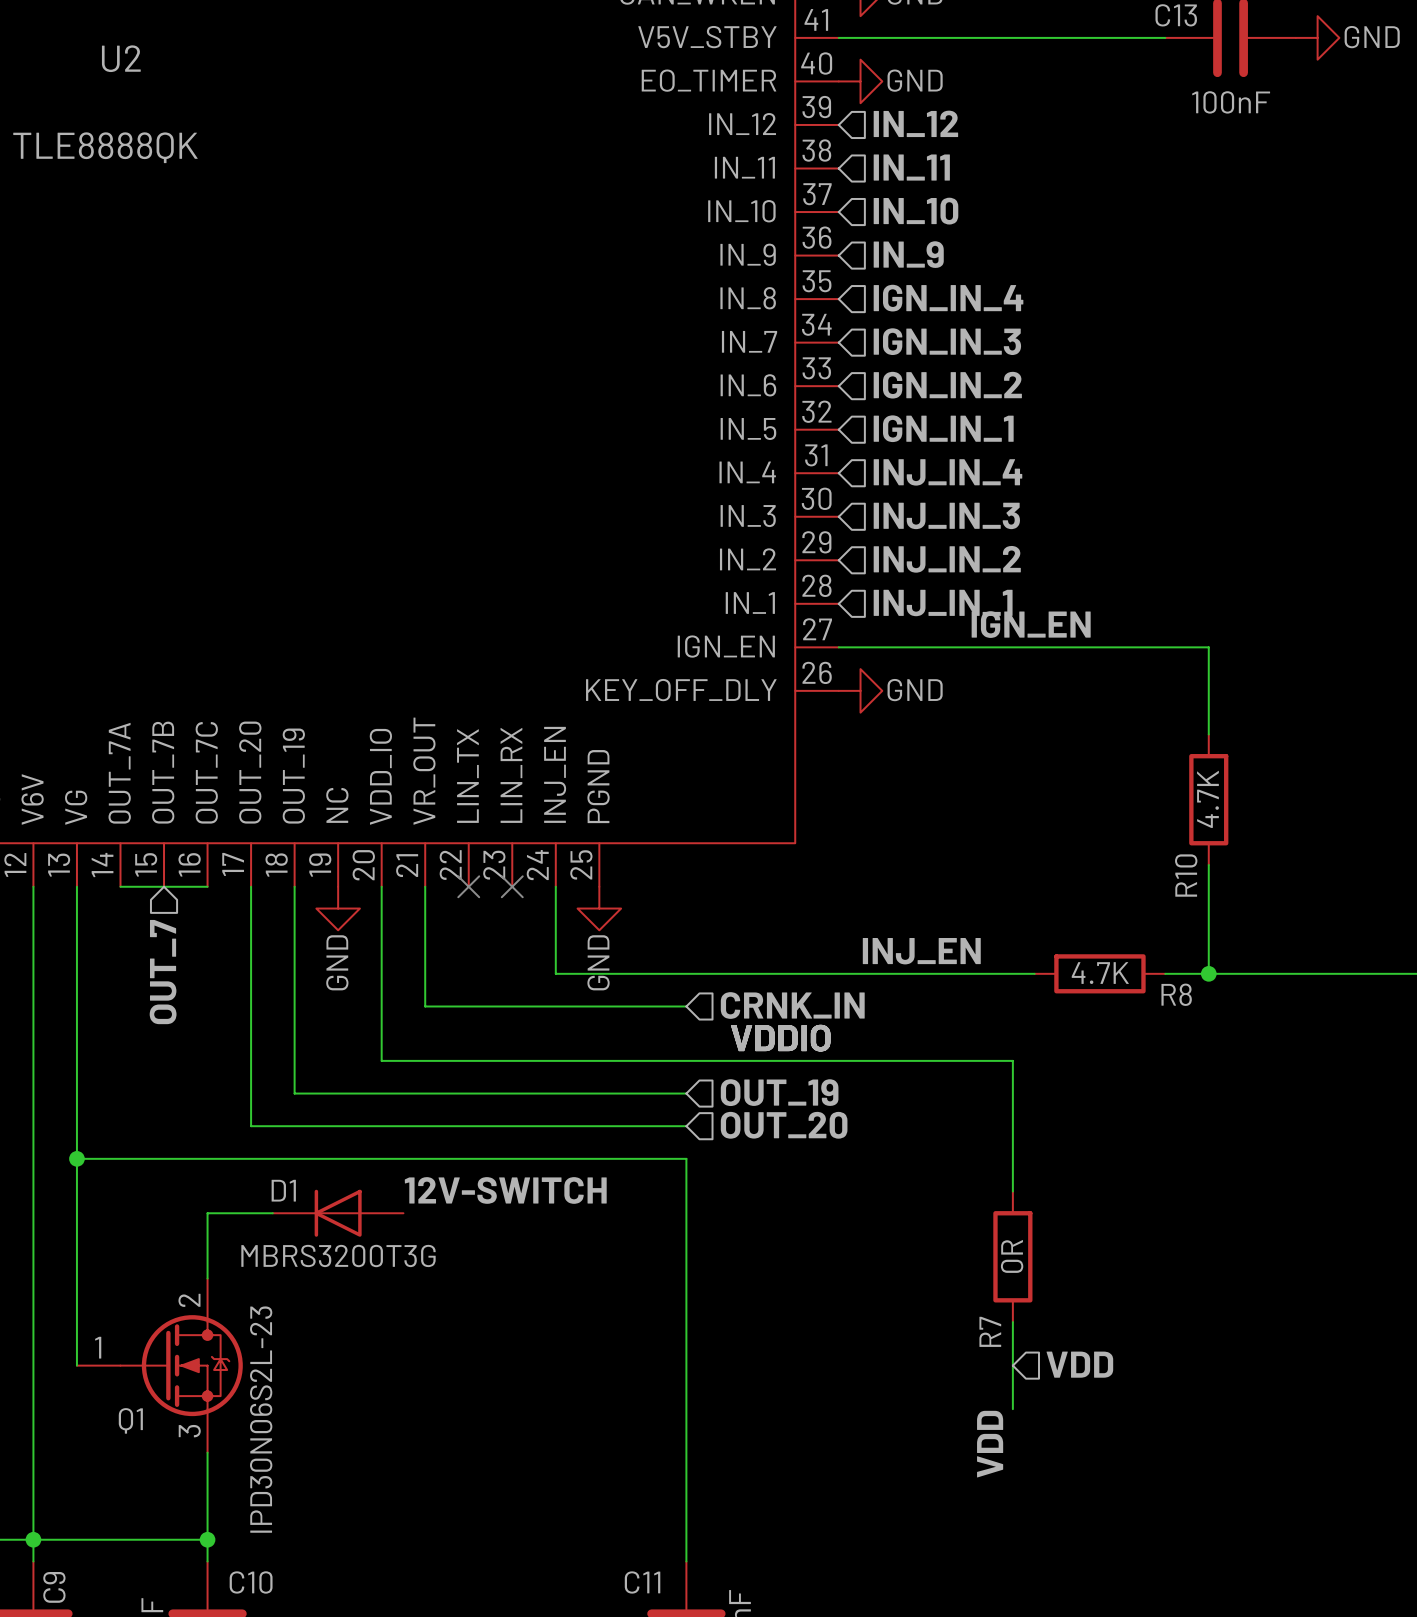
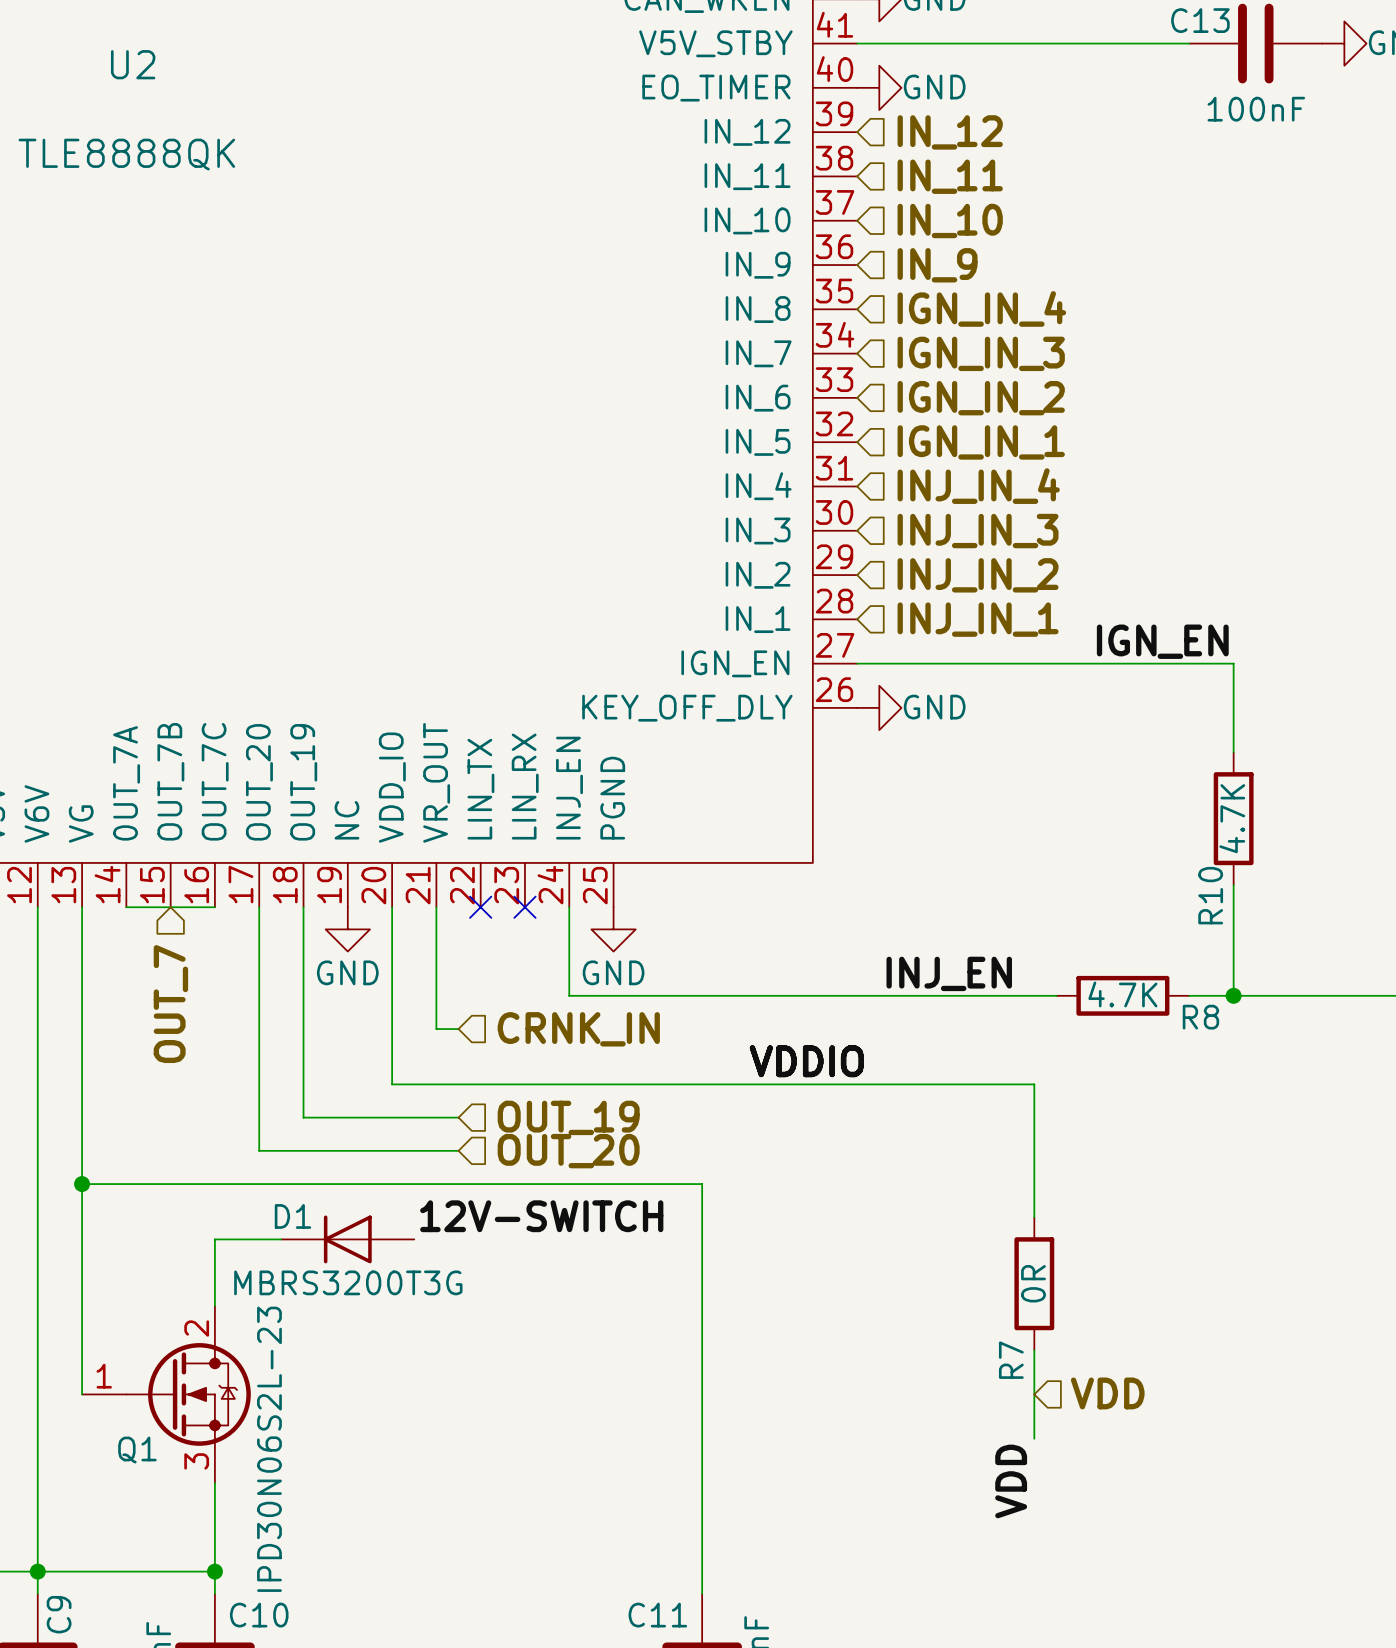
label position: IGN_EN (1031, 624) -> IGN_EN (1162, 641)
power symbol text rotation: 0° (337, 962) -> 90° clockwise (347, 972)
power symbol text rotation: 0° (598, 962) -> 90° clockwise (613, 972)
hierarchical label position: CRNK_IN (792, 1005) -> CRNK_IN (578, 1029)
wire: (446, 1006) (686, 1006) -> none
hierarchical label position: OUT_19 (779, 1092) -> OUT_19 (568, 1117)
wire: (446, 1093) (686, 1093) -> none
hierarchical label position: OUT_20 (784, 1125) -> OUT_20 (568, 1151)
wire: (446, 1126) (686, 1126) -> none

